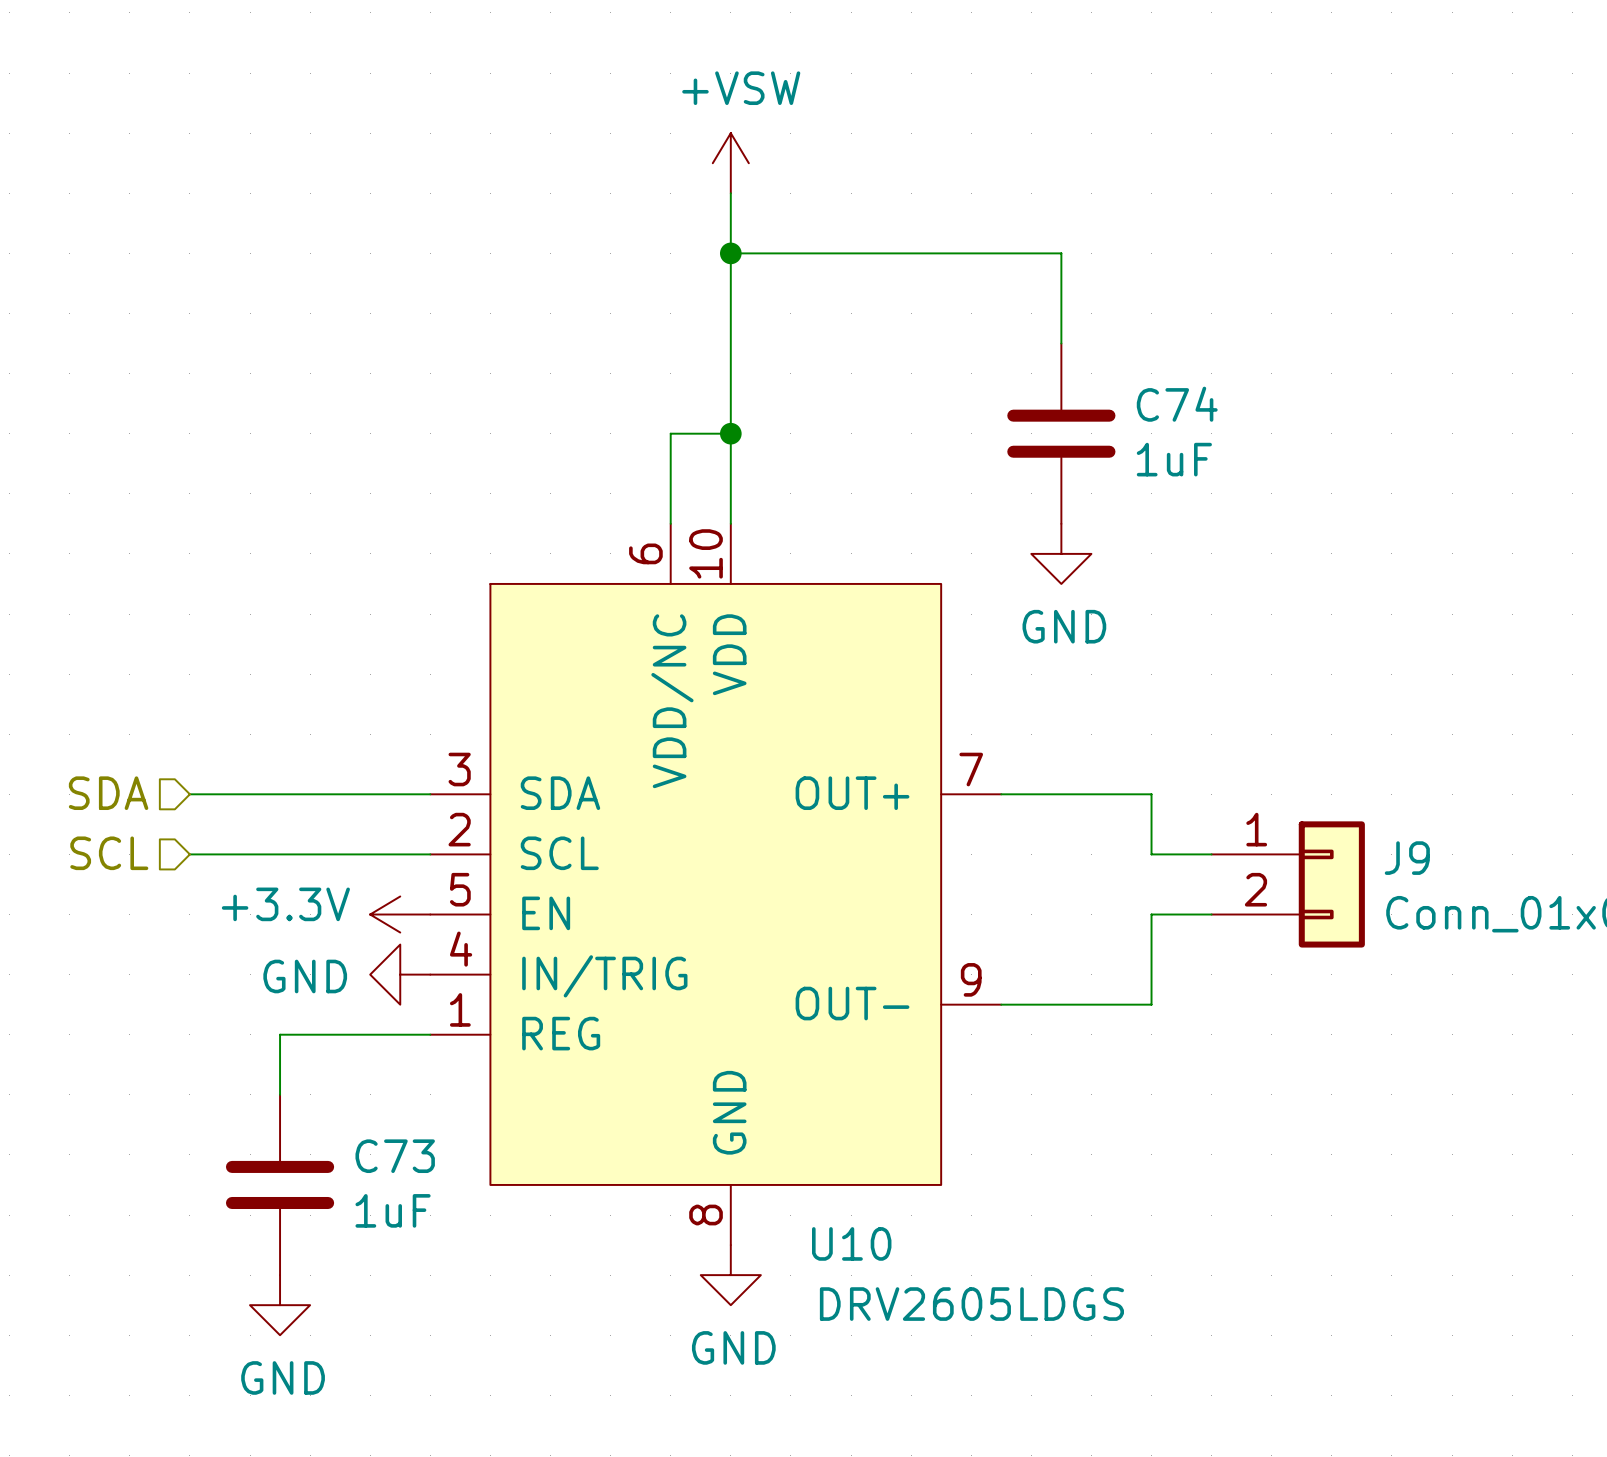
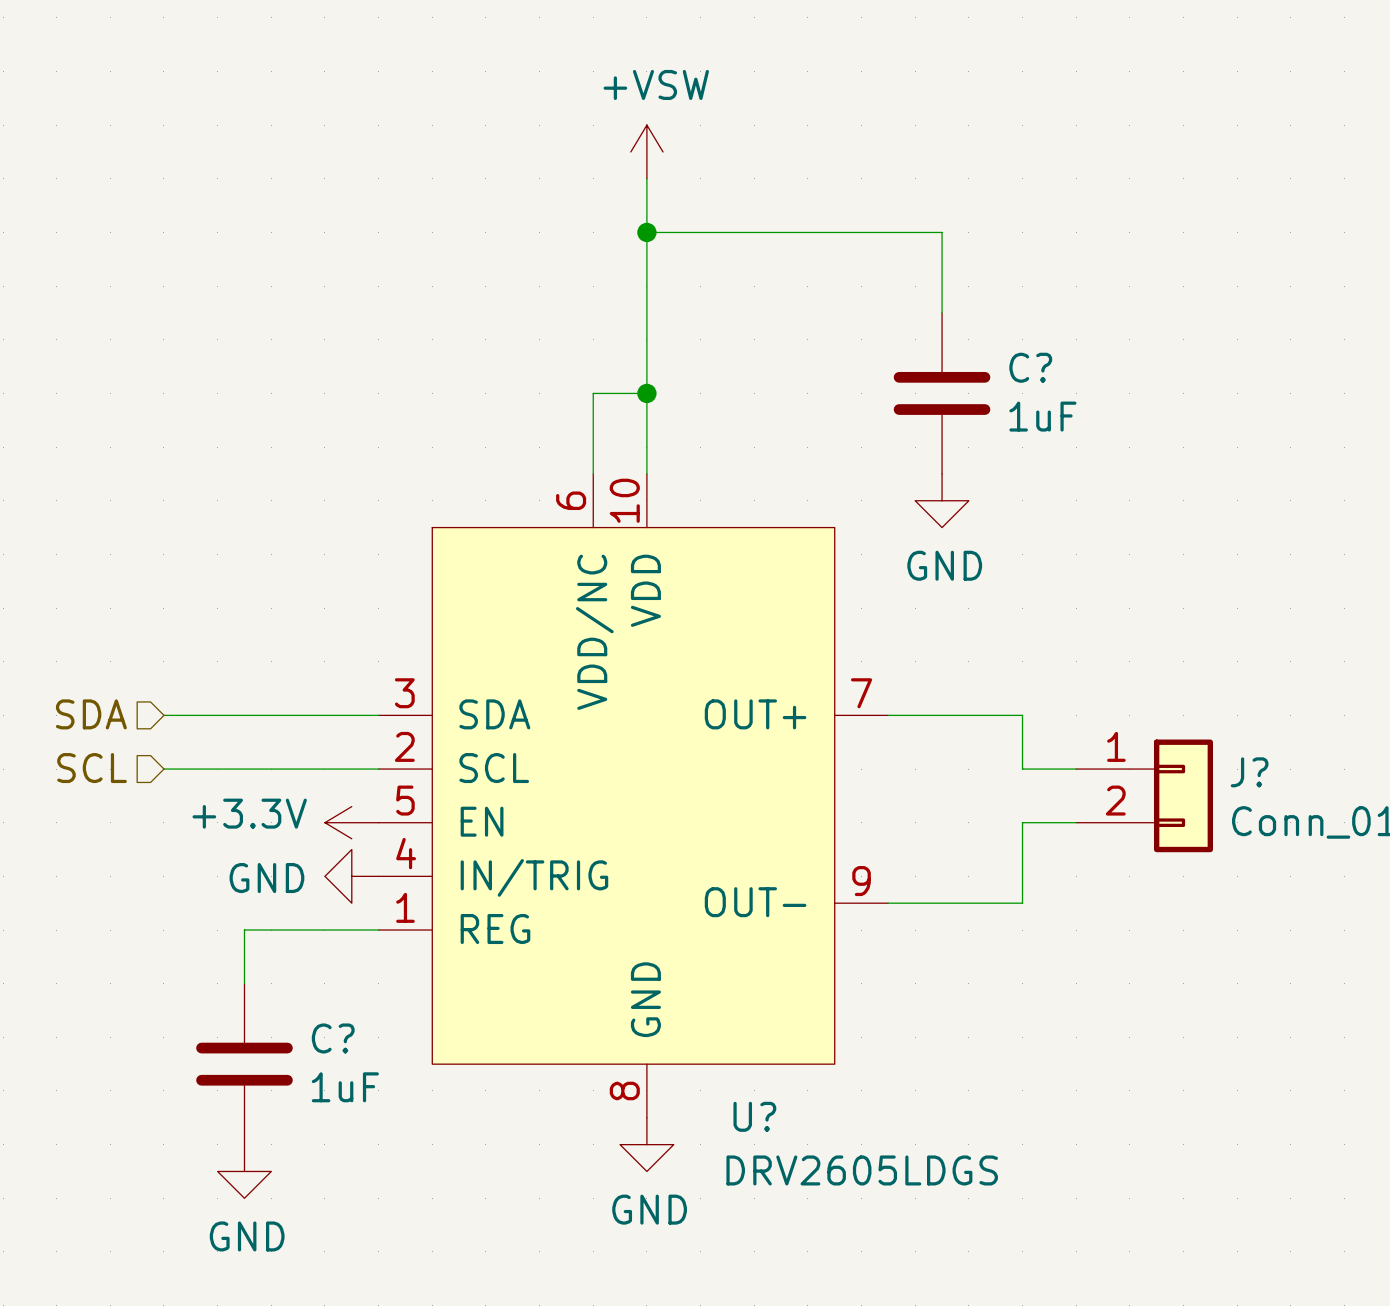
C74 name: C74 (1177, 404) -> C? (1030, 367)
J9 name: J9 (1407, 858) -> J? (1249, 772)
C73 name: C73 (395, 1156) -> C? (333, 1038)
U10 name: U10 (851, 1243) -> U? (754, 1116)

